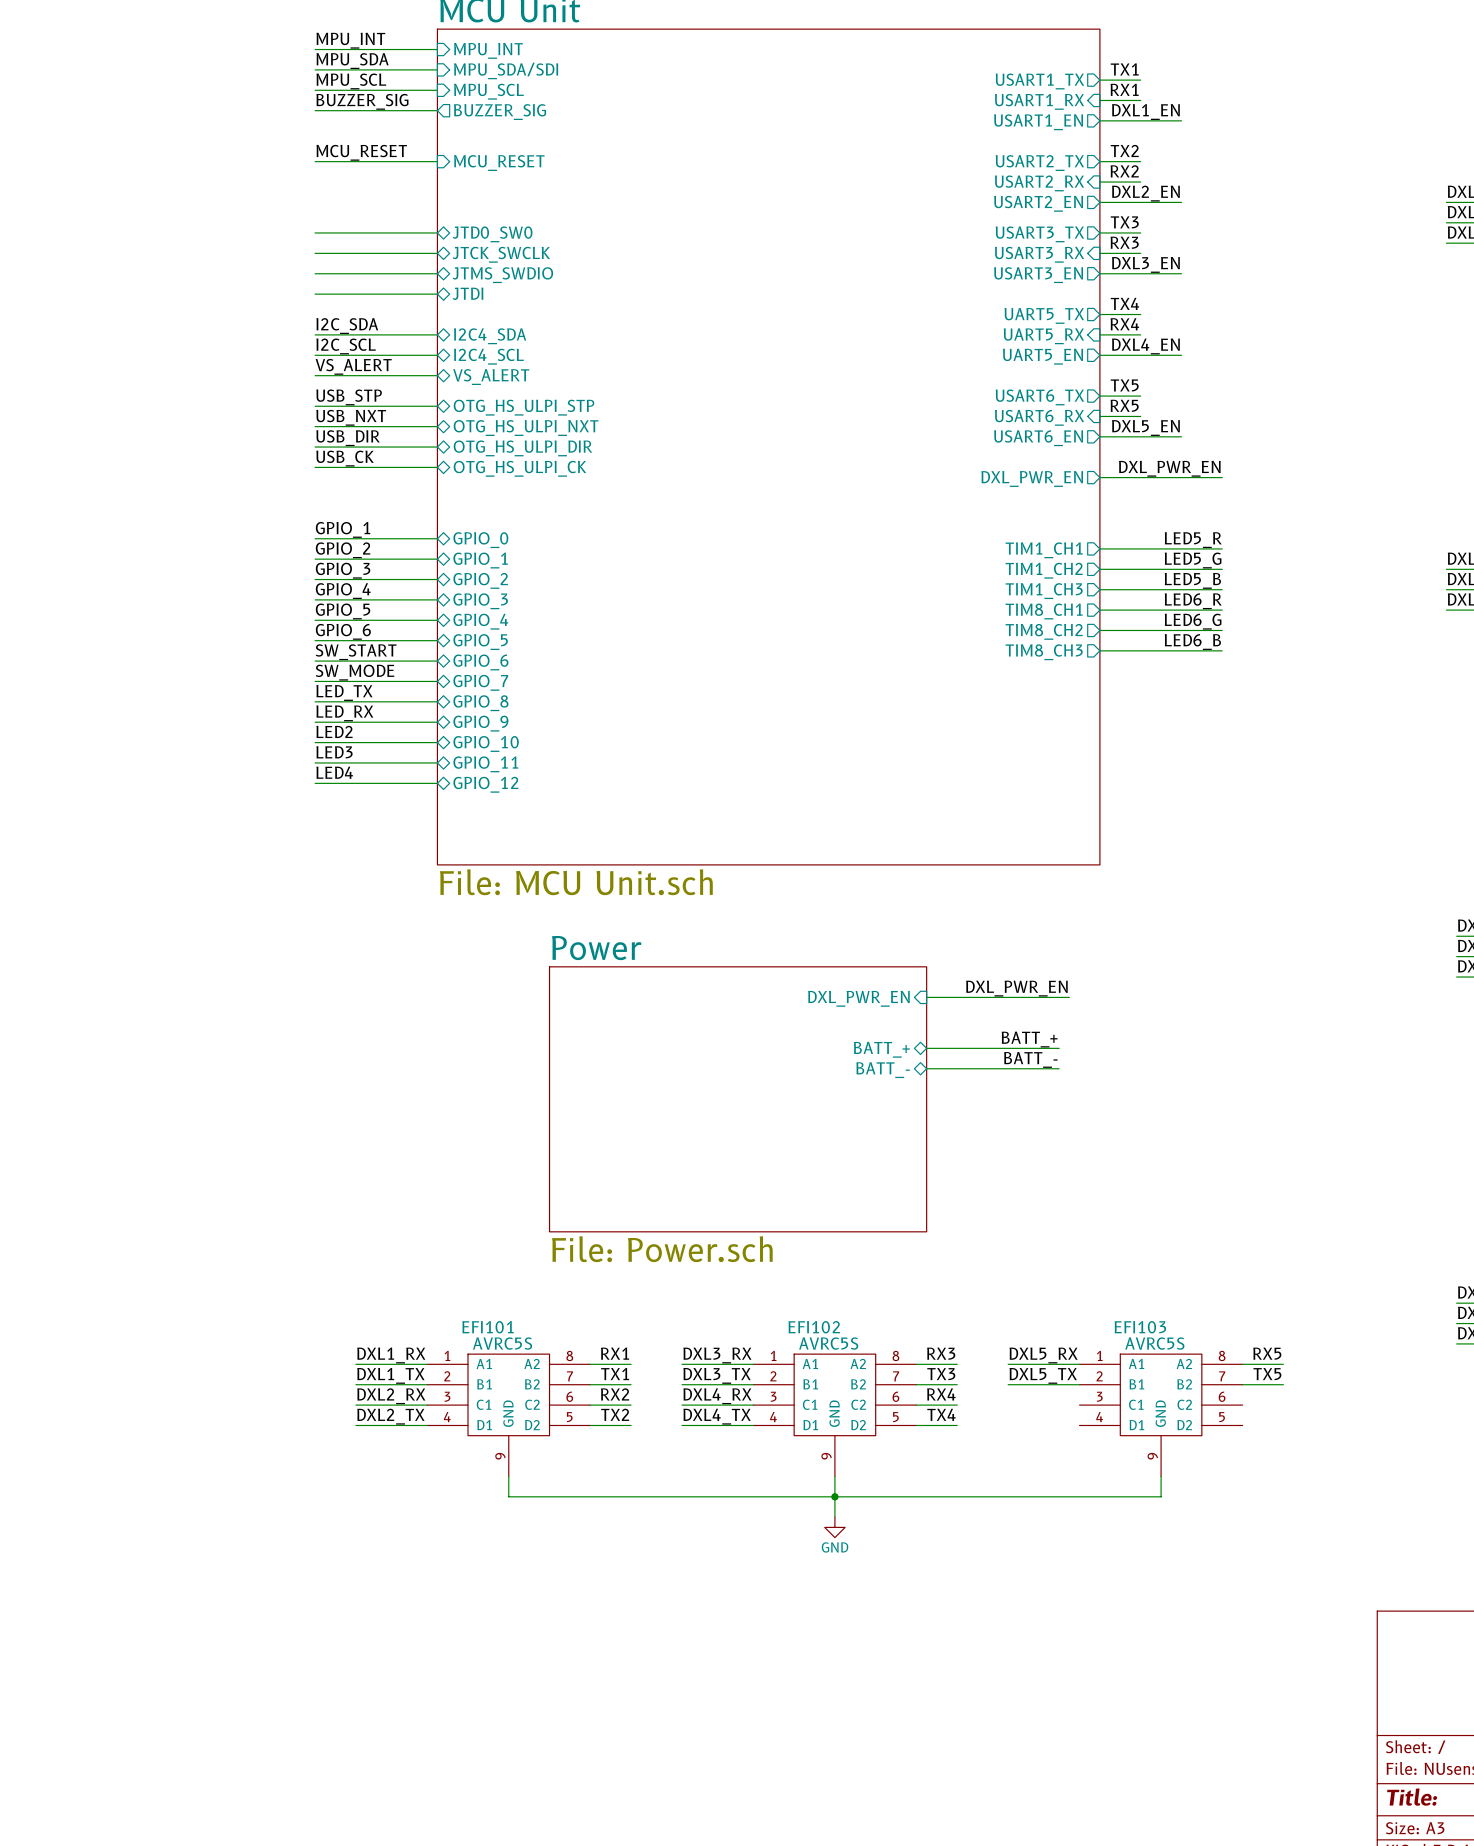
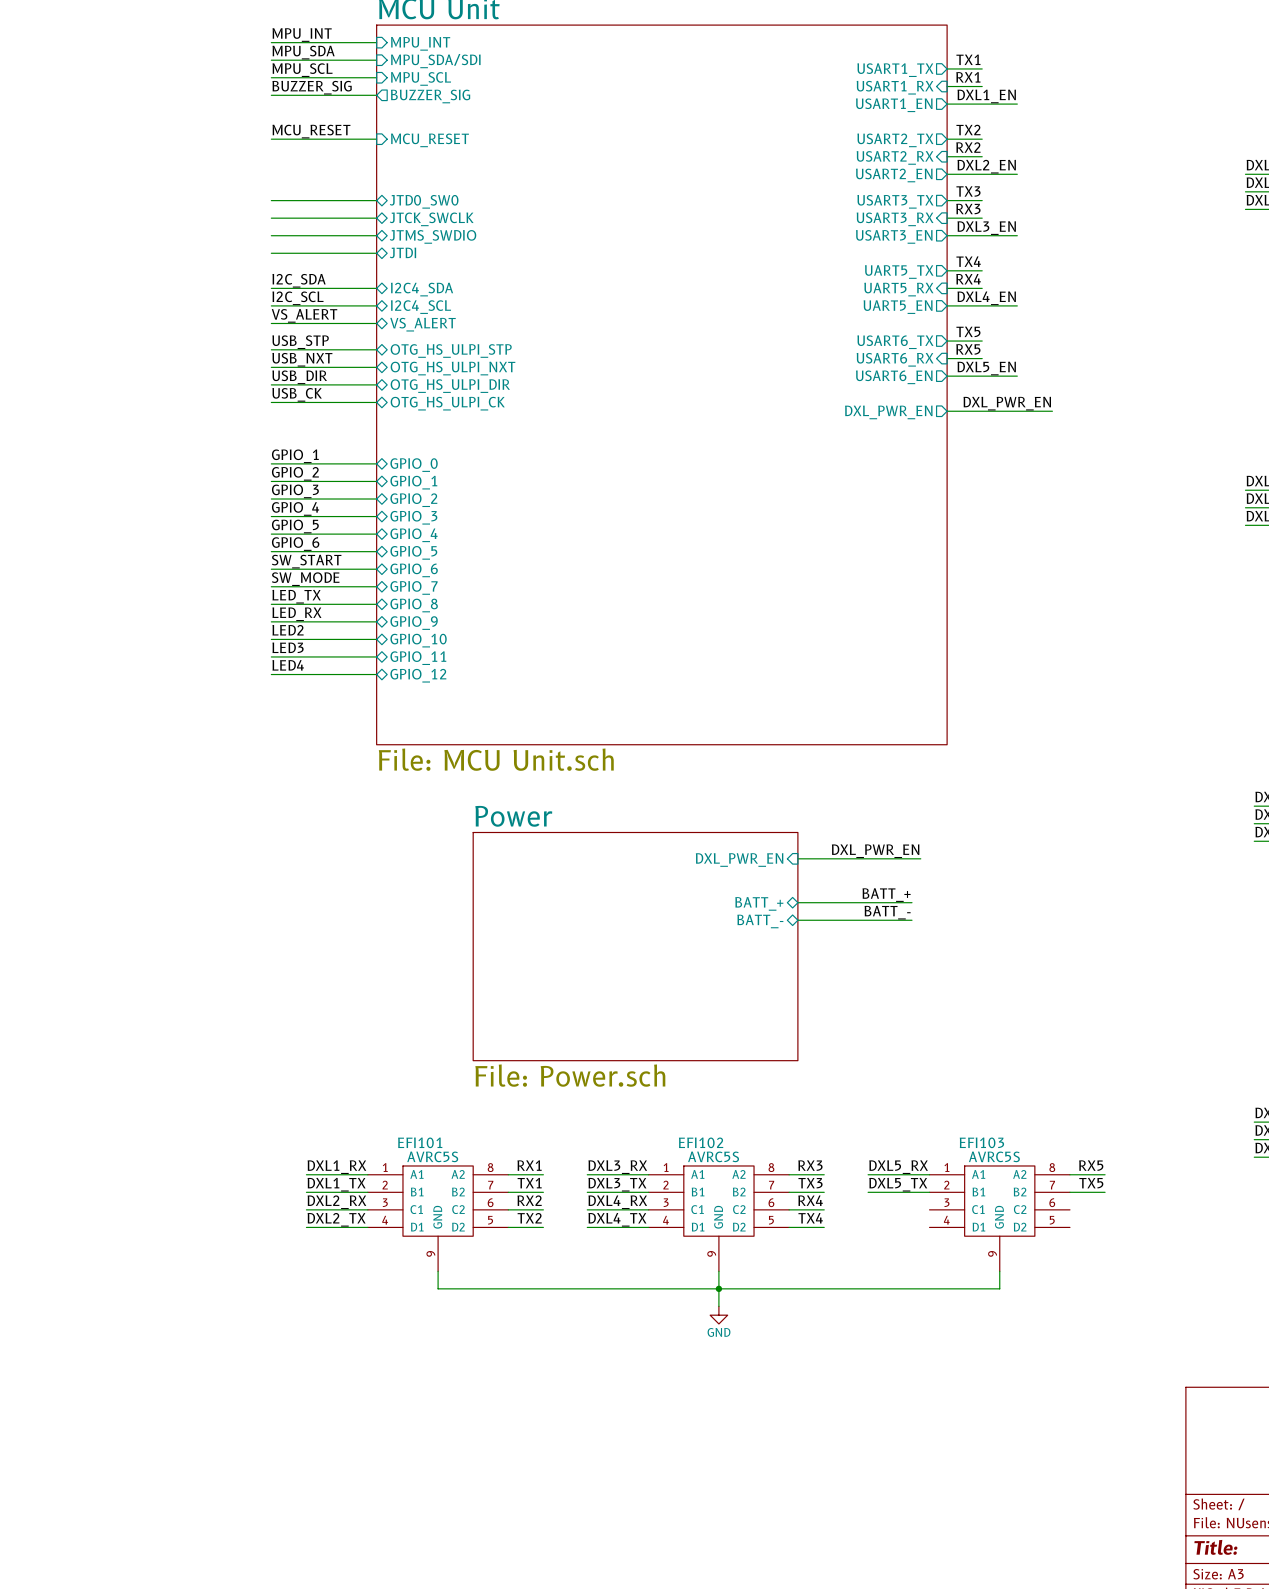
label: LED5_R (1193, 540) -> none
wire: (1099, 548) (1222, 548) -> none
sheet pin: TIM1_CH1 (1044, 550) -> none
label: LED5_G (1193, 560) -> none
wire: (1099, 569) (1222, 569) -> none
sheet pin: TIM1_CH2 (1044, 570) -> none
label: LED5_B (1192, 580) -> none
wire: (1099, 589) (1222, 589) -> none
sheet pin: TIM1_CH3 (1044, 591) -> none
label: LED6_R (1193, 601) -> none
wire: (1099, 610) (1222, 610) -> none
sheet pin: TIM8_CH1 (1044, 611) -> none
label: LED6_G (1193, 621) -> none
wire: (1099, 630) (1222, 630) -> none
sheet pin: TIM8_CH2 (1044, 631) -> none
label: LED6_B (1192, 642) -> none
wire: (1099, 650) (1222, 650) -> none
sheet pin: TIM8_CH3 (1044, 652) -> none

